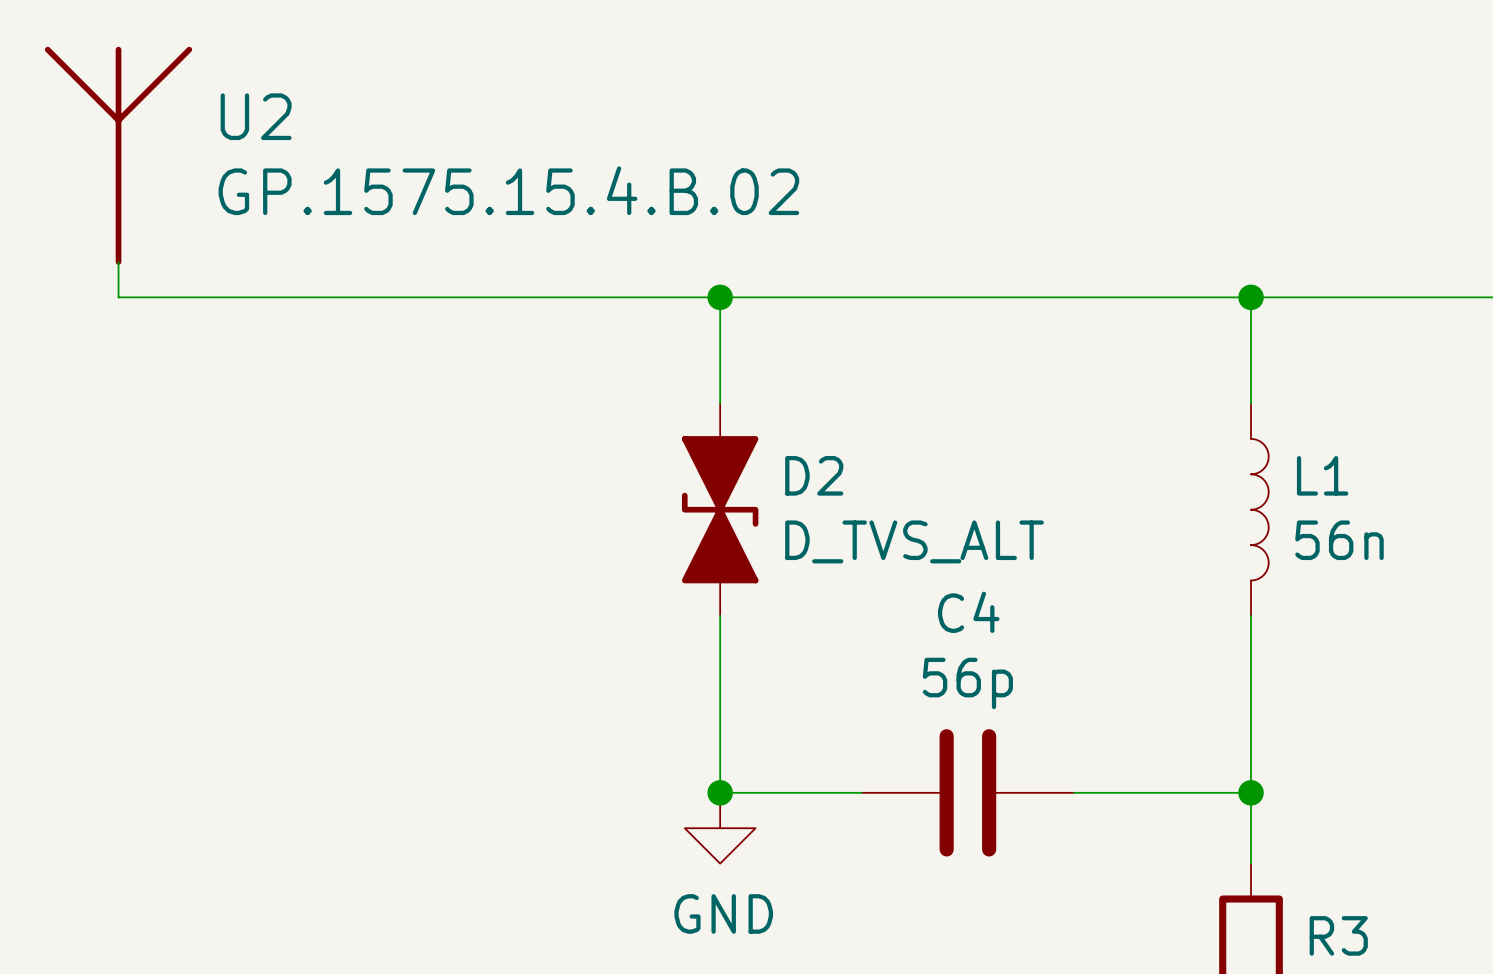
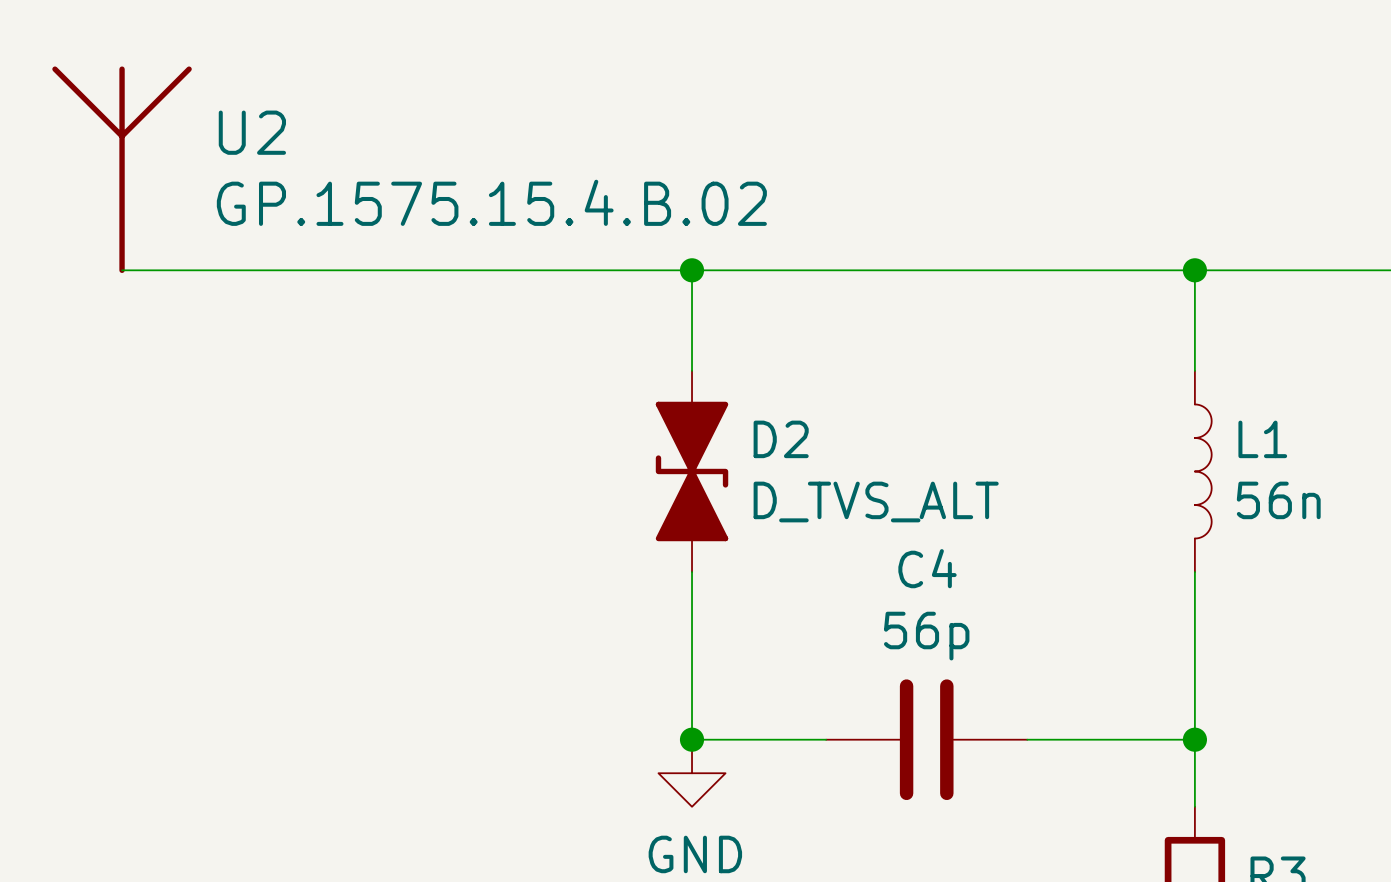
U2 position: (118, 155) -> (122, 169)

